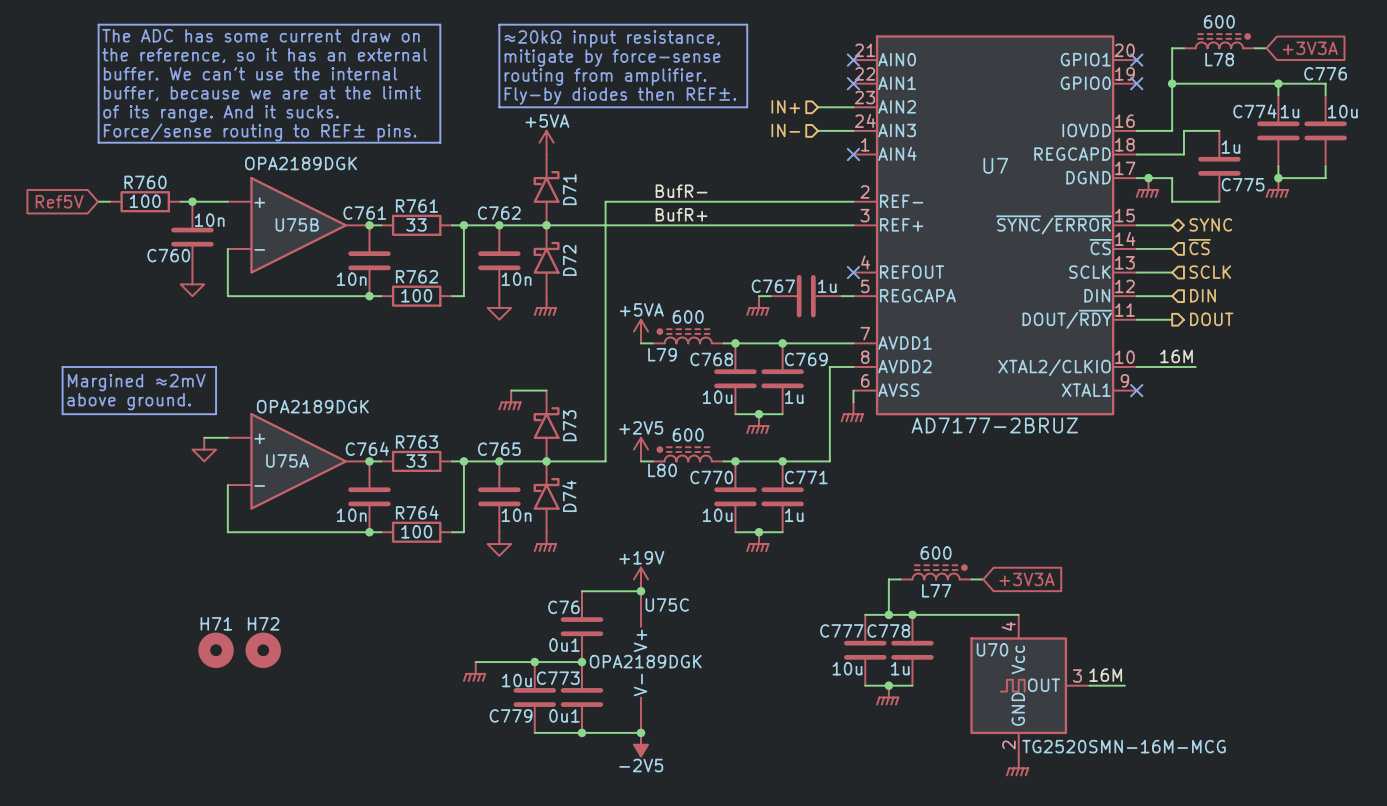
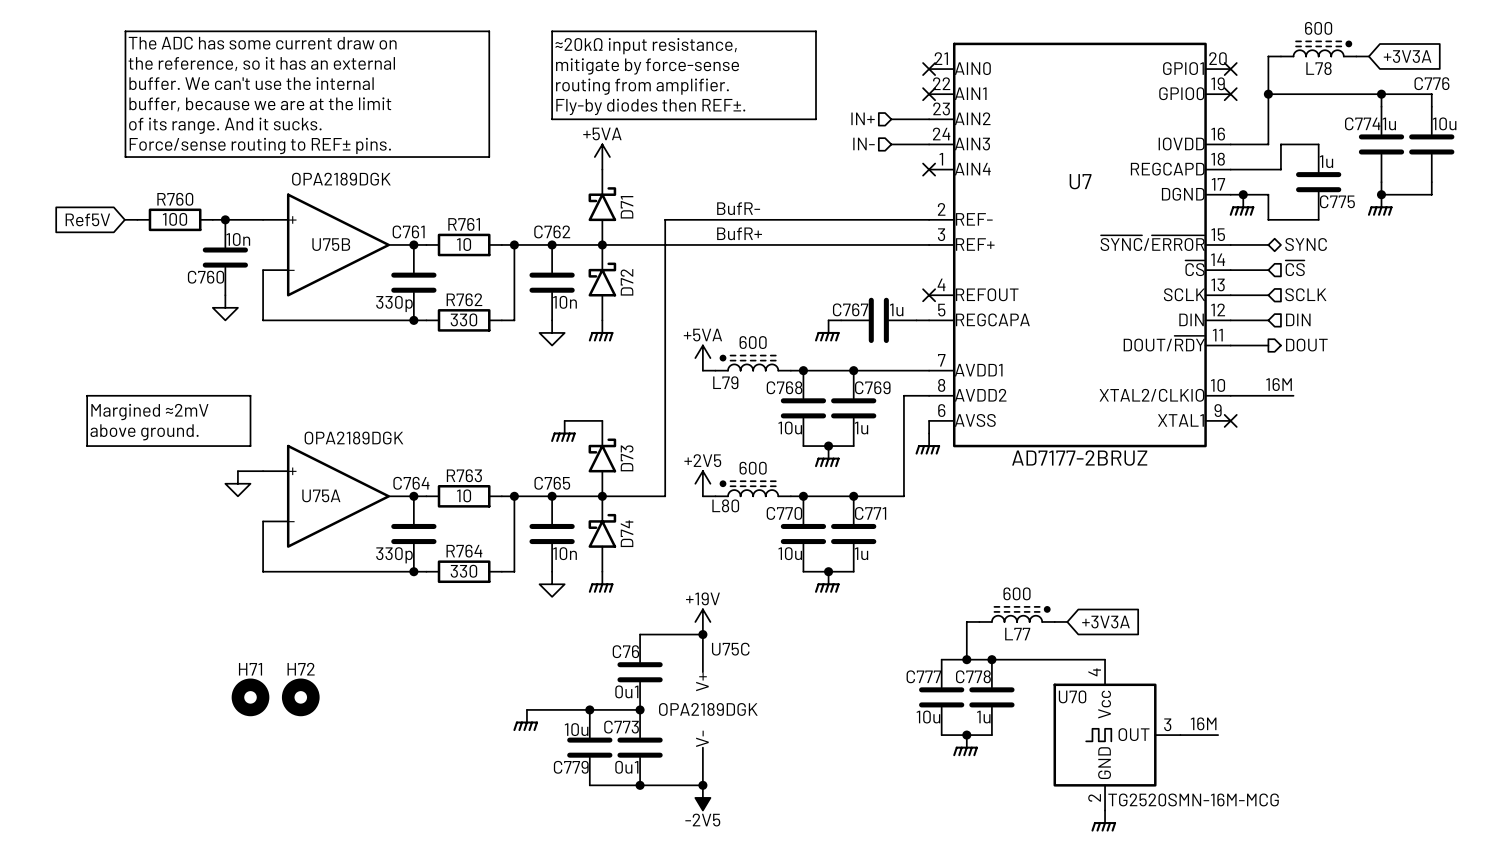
R761 value: 33 (416, 224) -> 10 (464, 244)
C761 value: 10n (351, 279) -> 330p (394, 303)
R762 value: 100 (416, 295) -> 330 (463, 319)
R763 value: 33 (416, 460) -> 10 (464, 495)
C764 value: 10n (351, 515) -> 330p (394, 555)
R764 value: 100 (416, 531) -> 330 (463, 571)

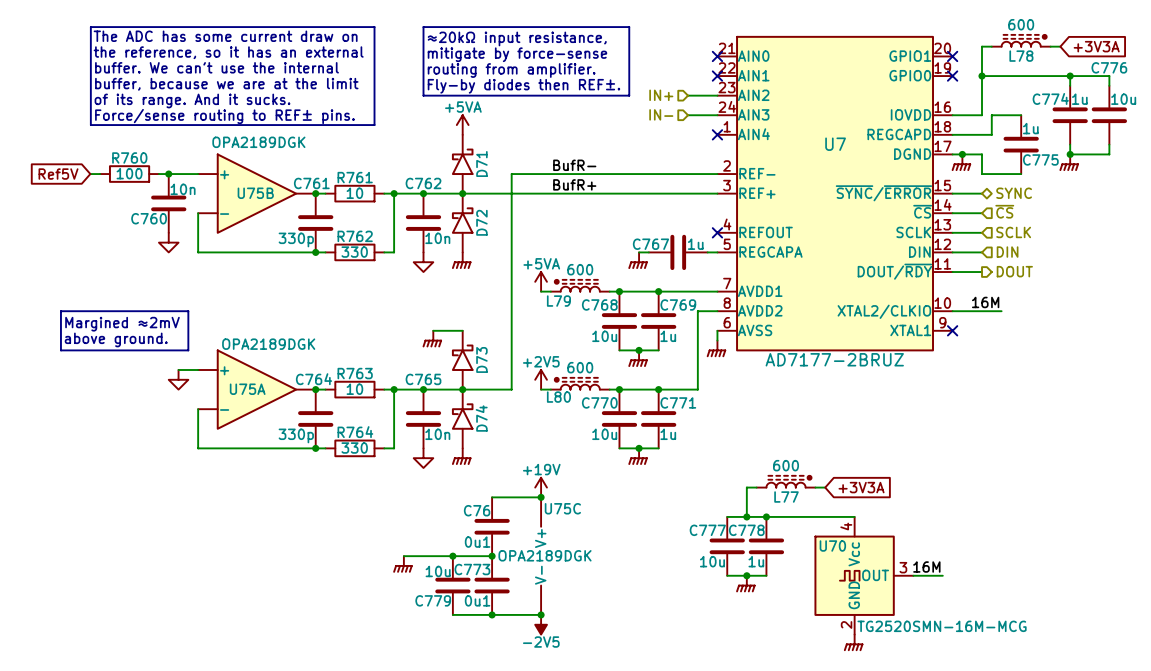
H71: (250, 697) -> none
H72: (300, 697) -> none

